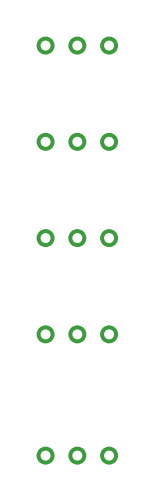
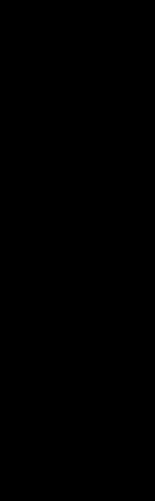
part: (77, 45) -> none
part: (77, 141) -> none
part: (77, 238) -> none
part: (77, 334) -> none
part: (77, 455) -> none

